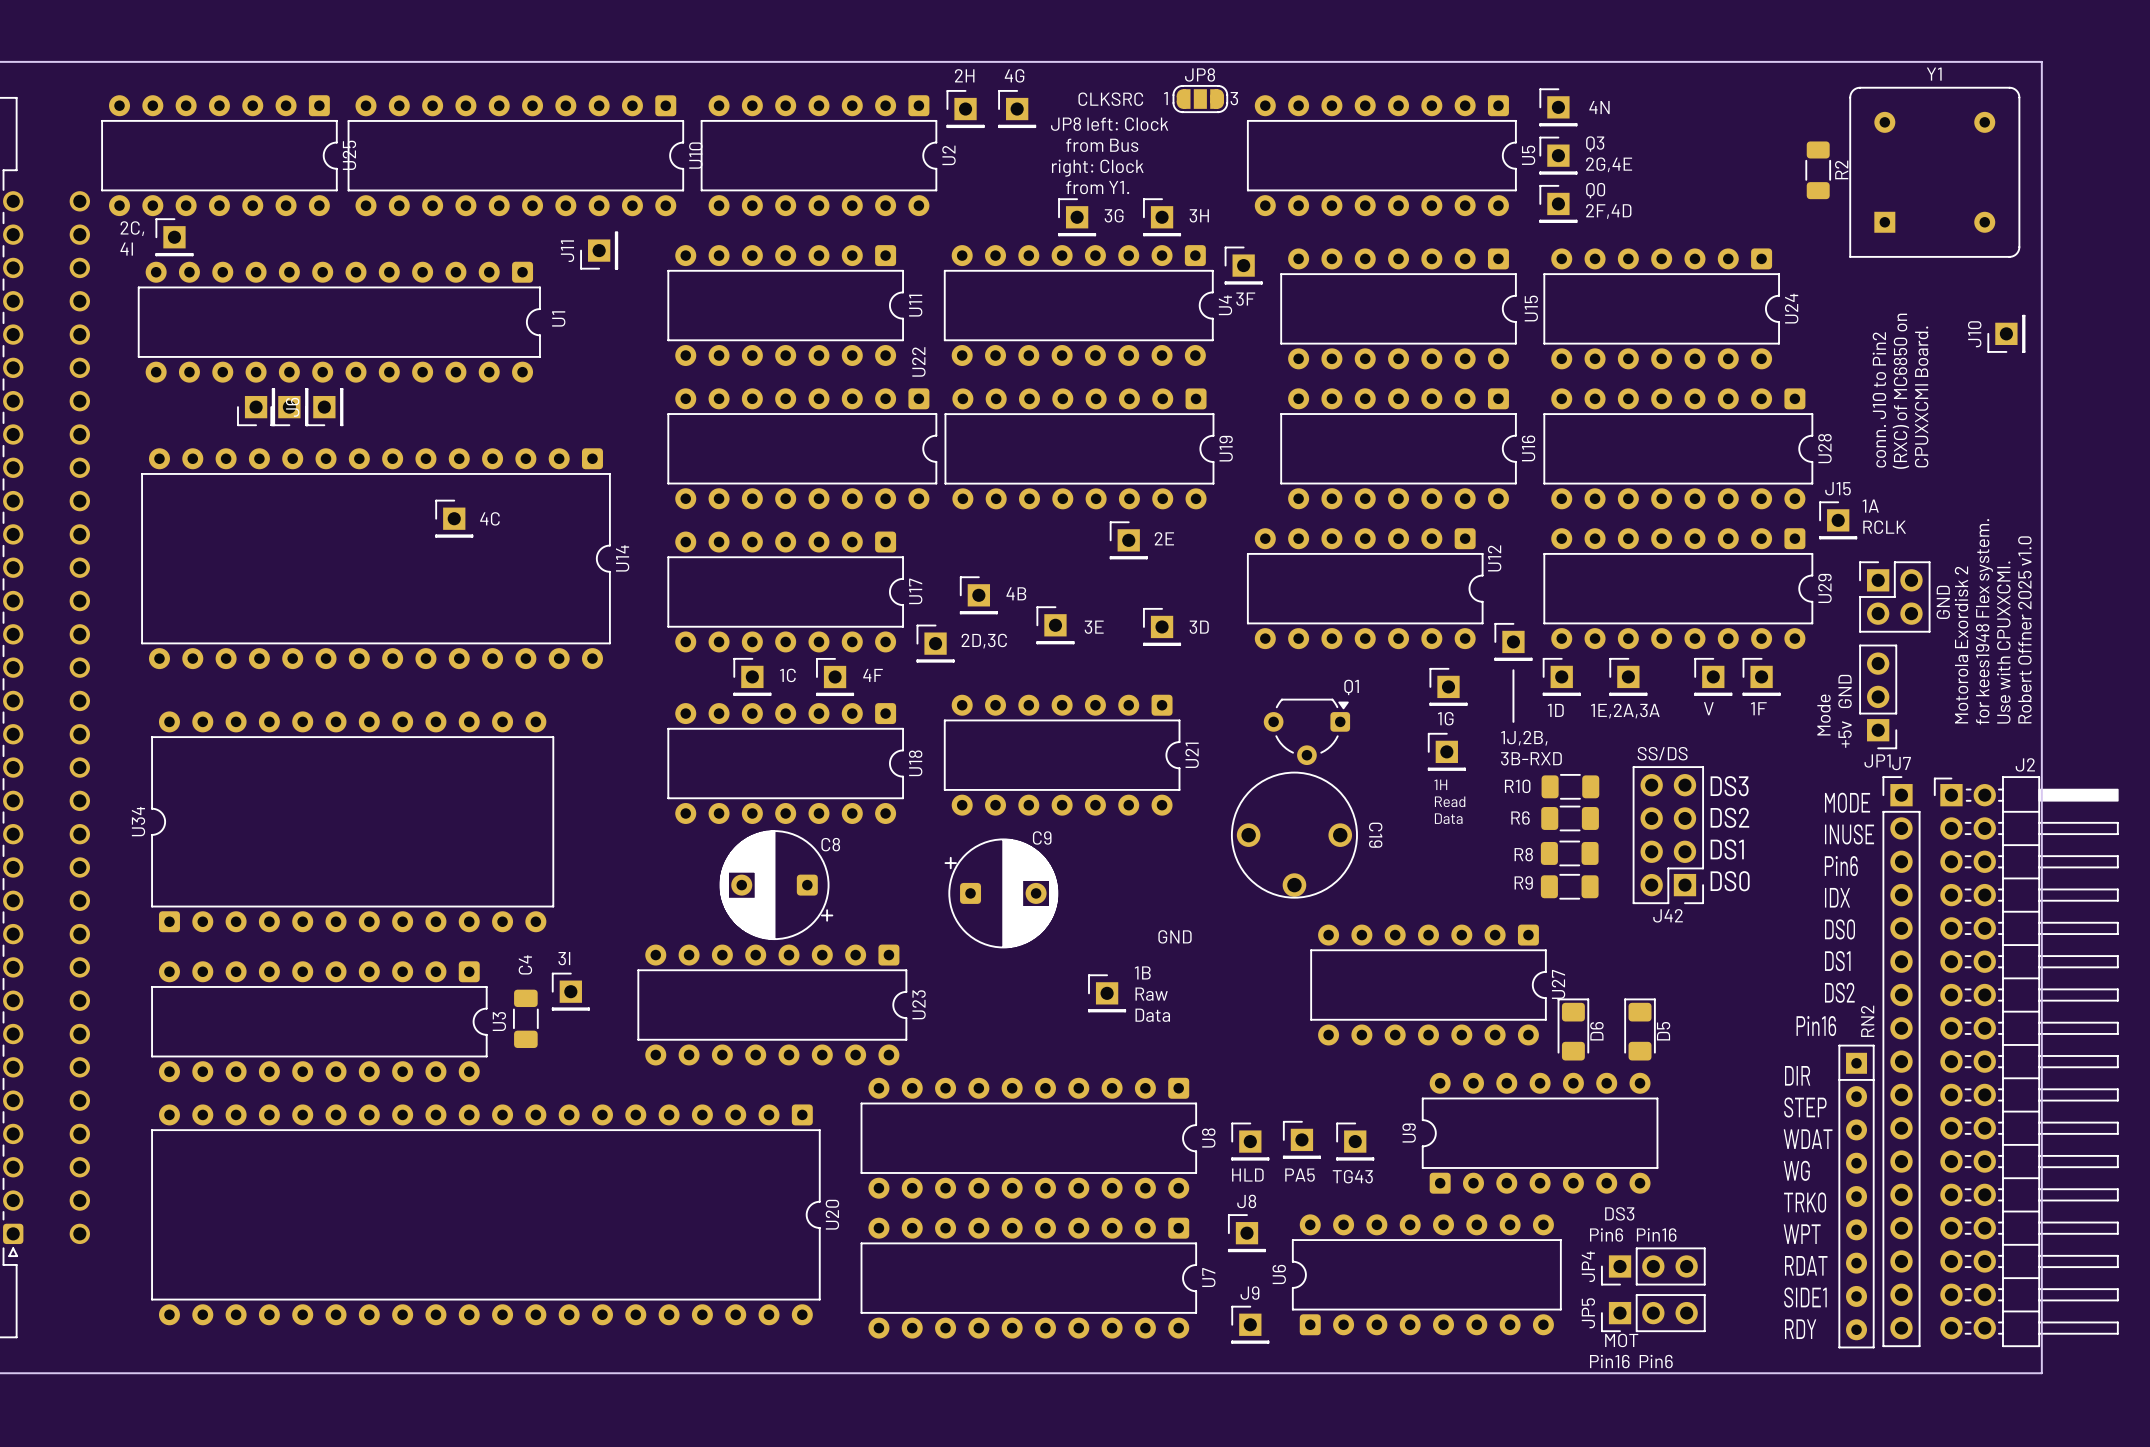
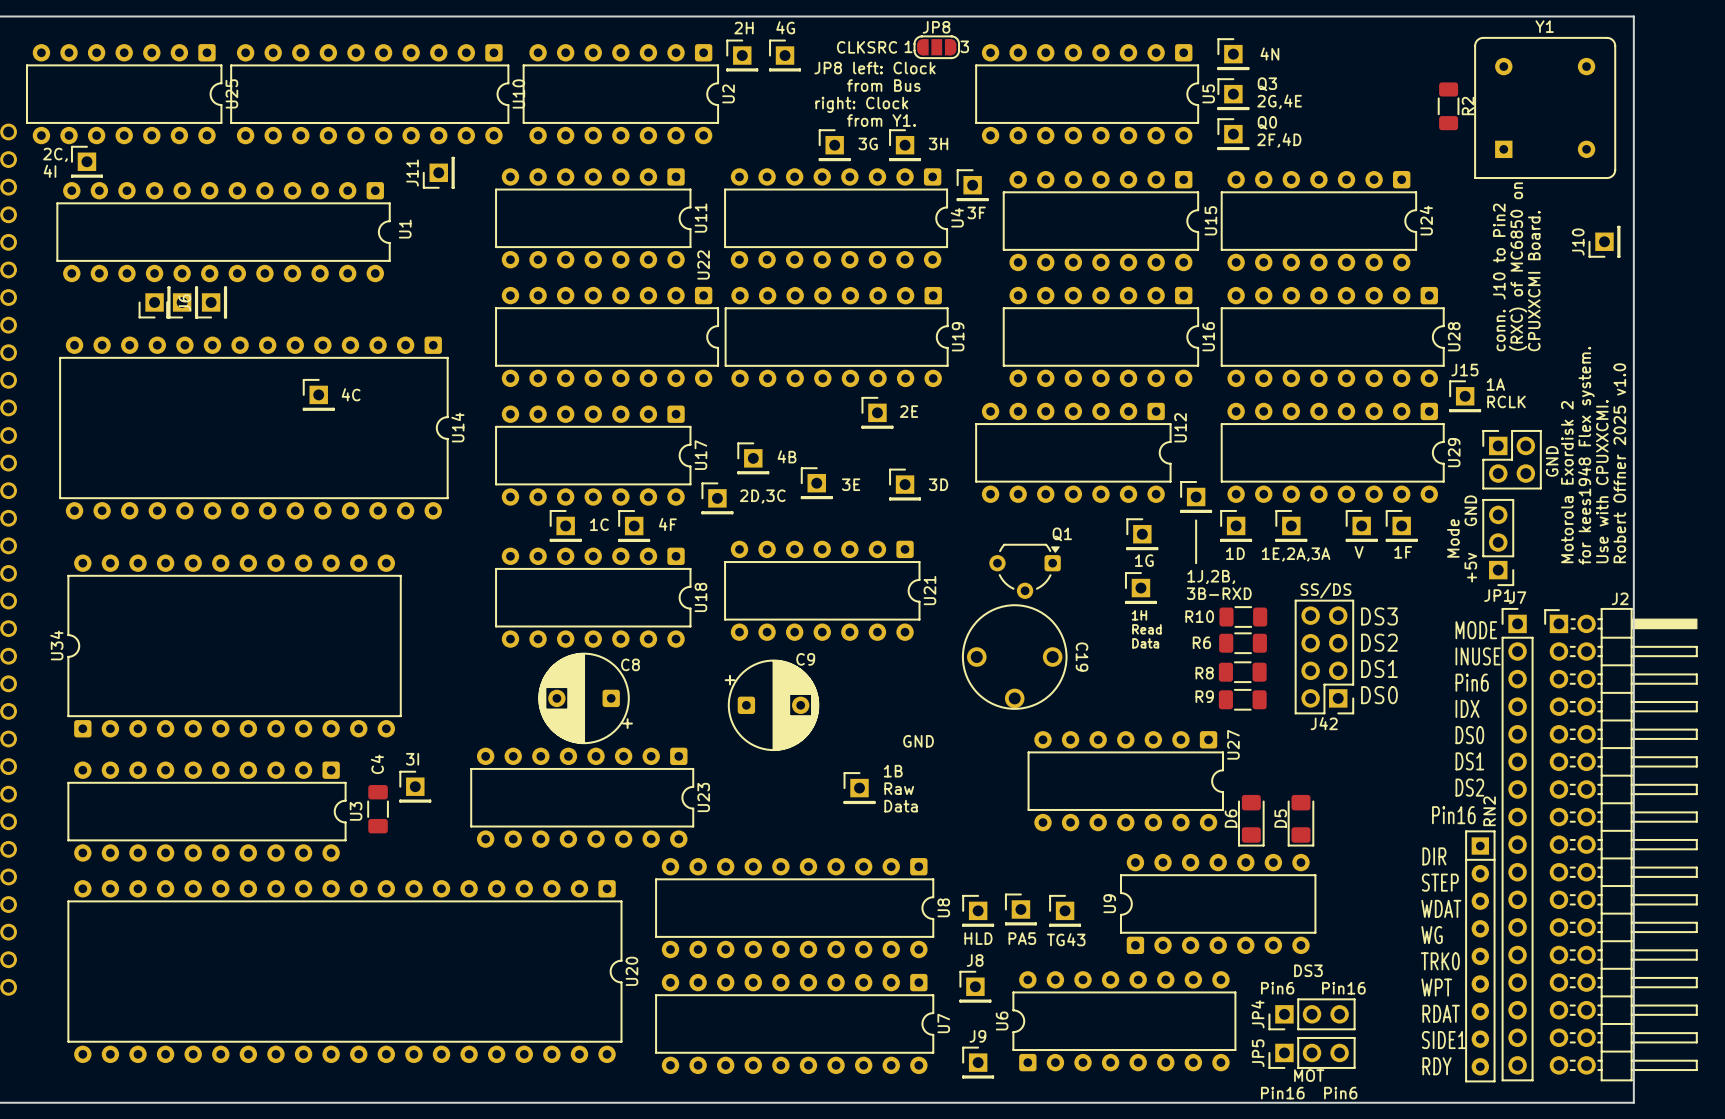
U27 name position: U27 (1558, 984) -> U27 (1233, 744)
D6 rotation: 0° (1573, 1029) -> 180° (1251, 820)
D5 rotation: 0° (1640, 1029) -> 180° (1300, 820)

